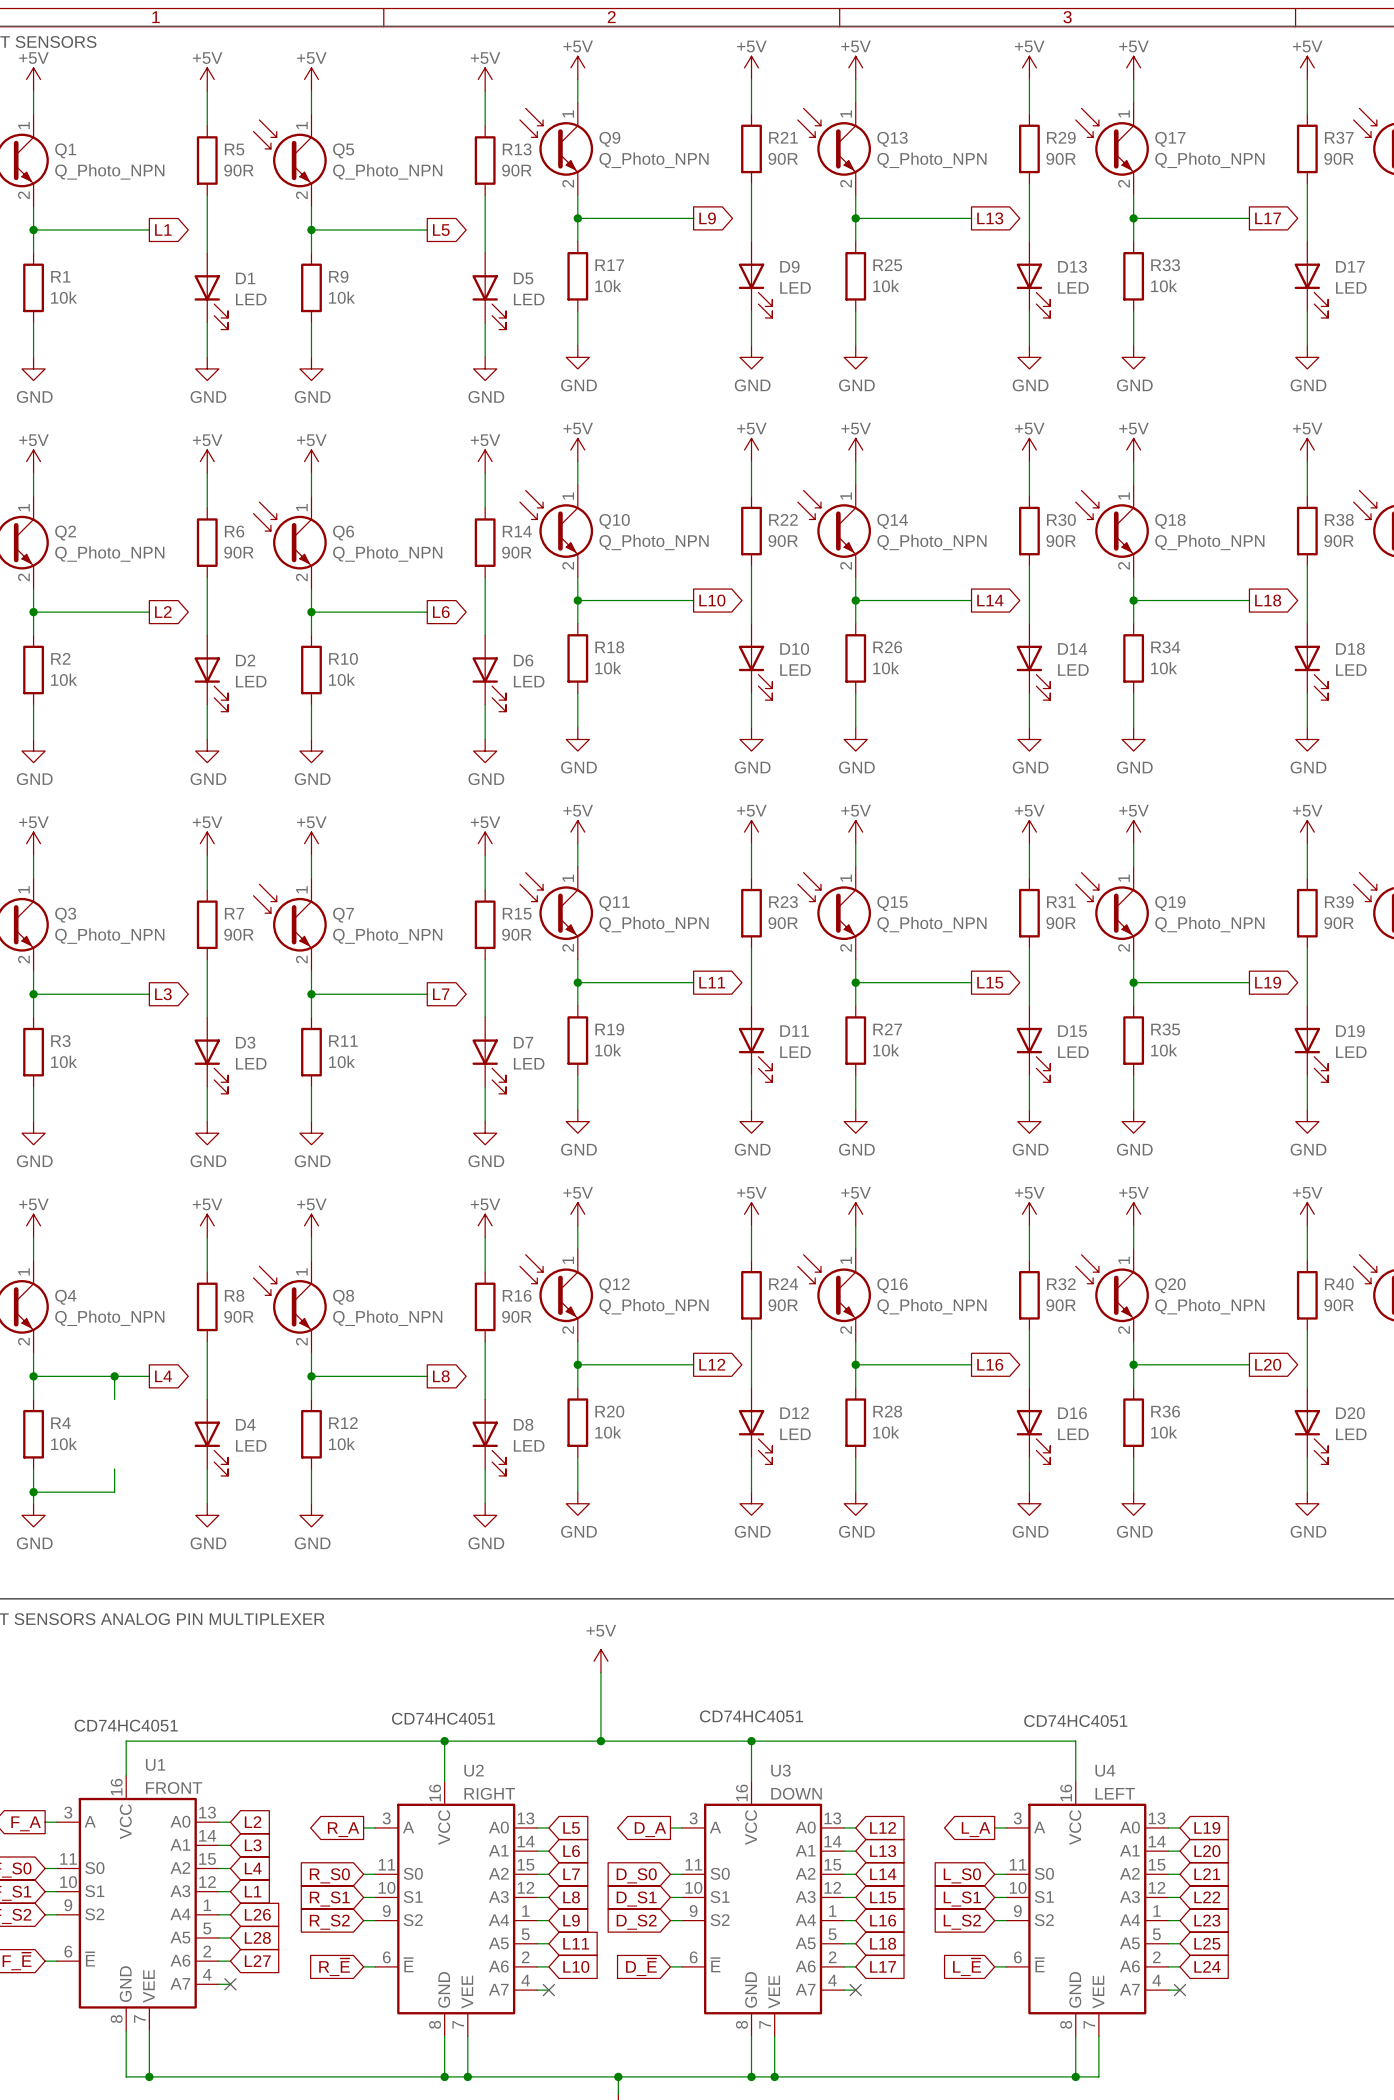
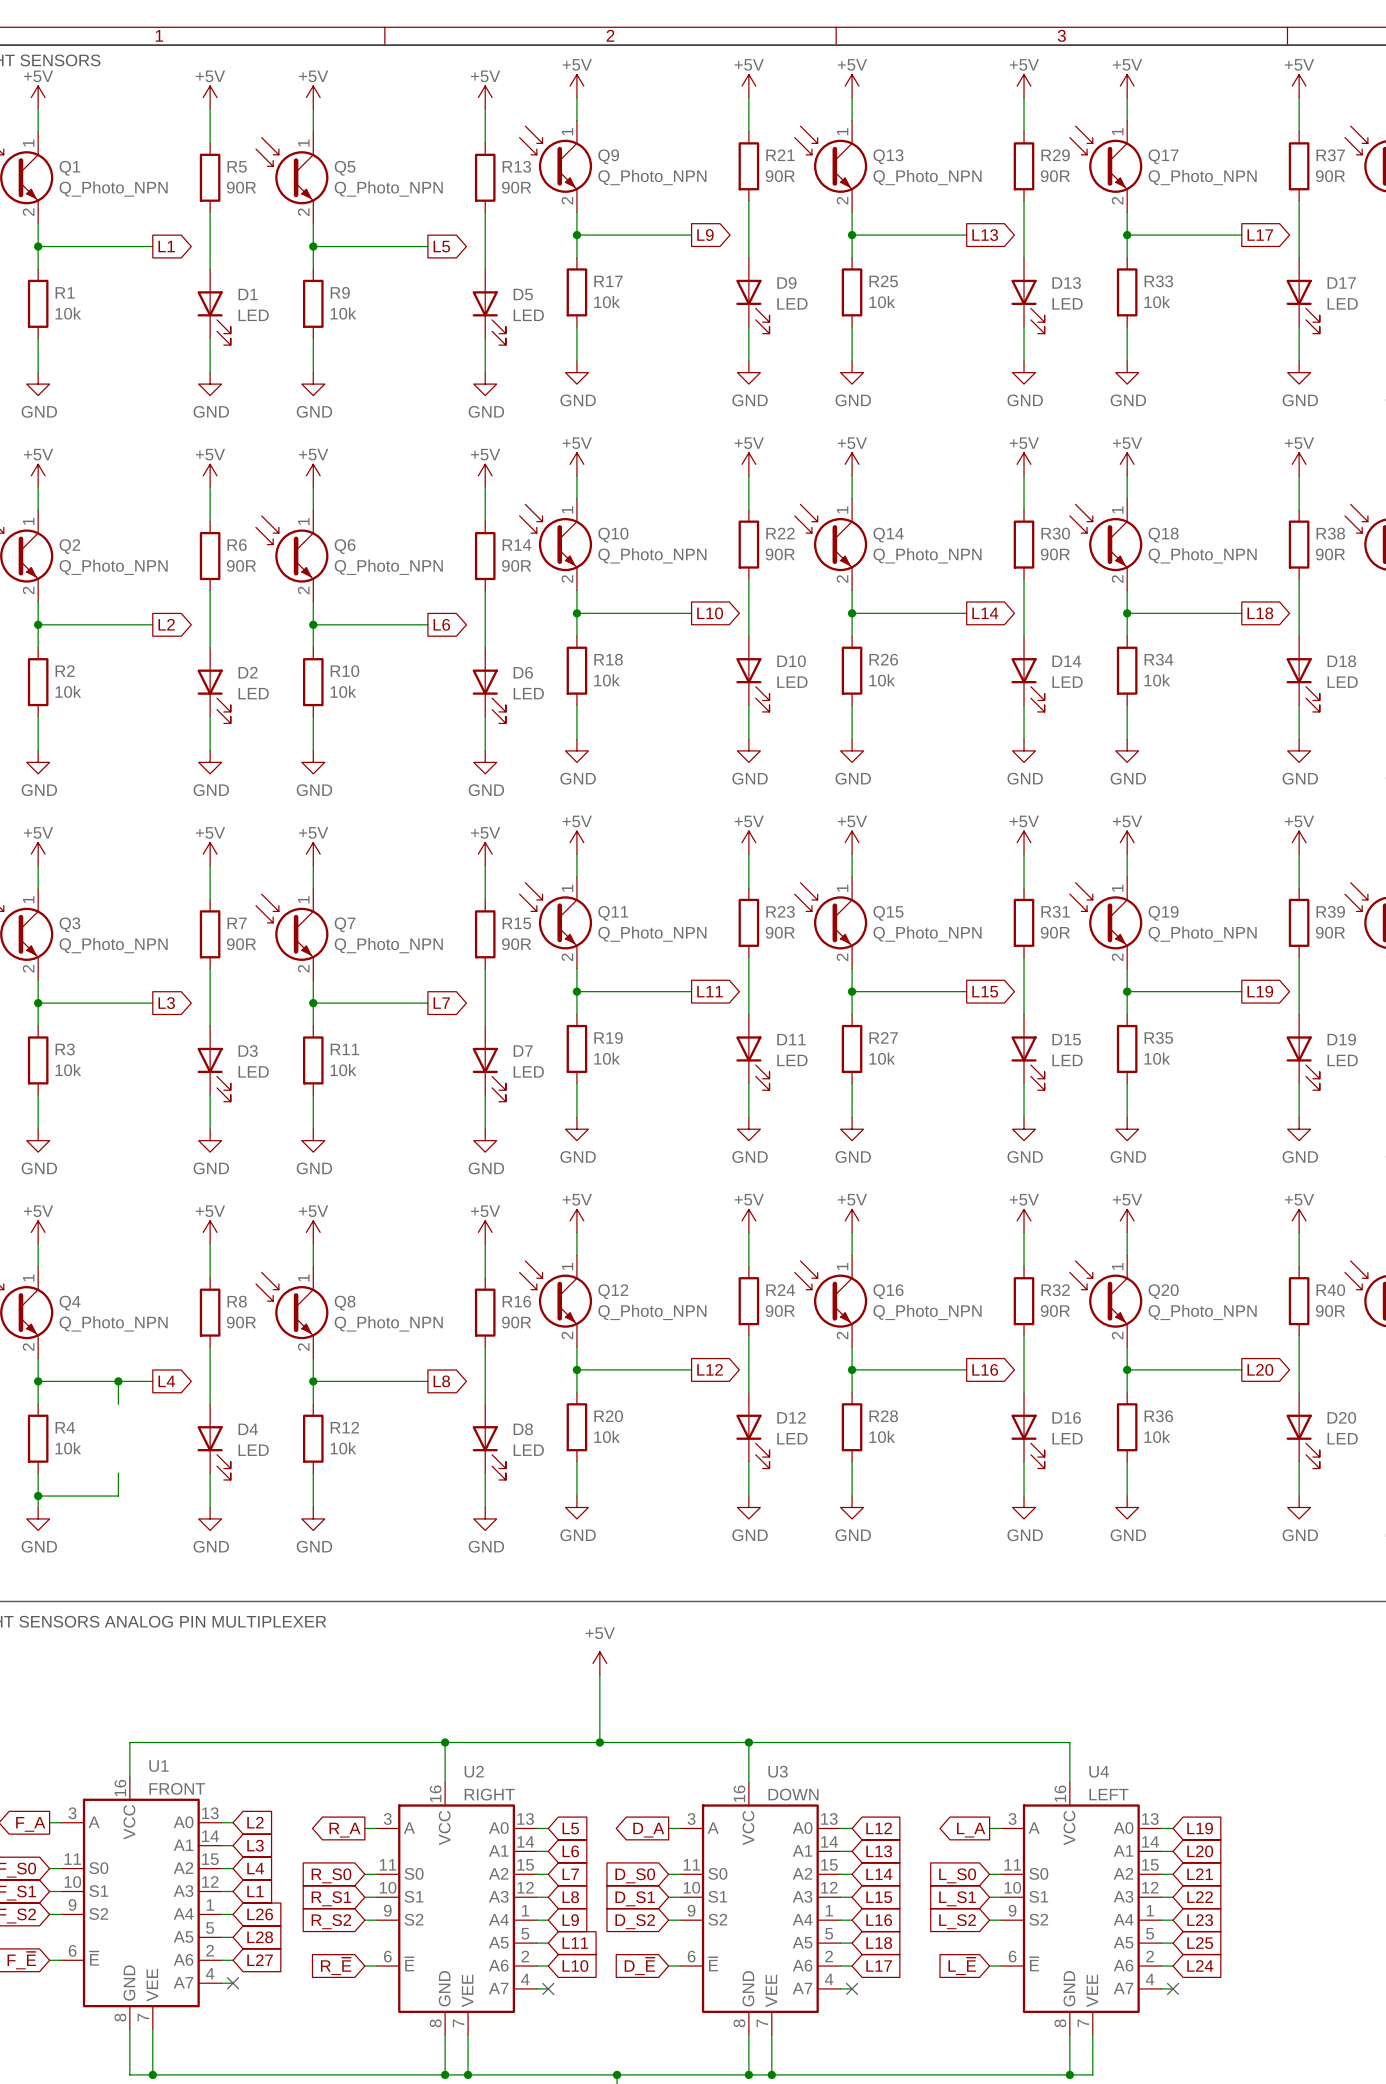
text: CD74HC4051 (751, 1716) -> none
text: CD74HC4051 (443, 1718) -> none
text: CD74HC4051 (1075, 1721) -> none
text: CD74HC4051 (126, 1725) -> none

